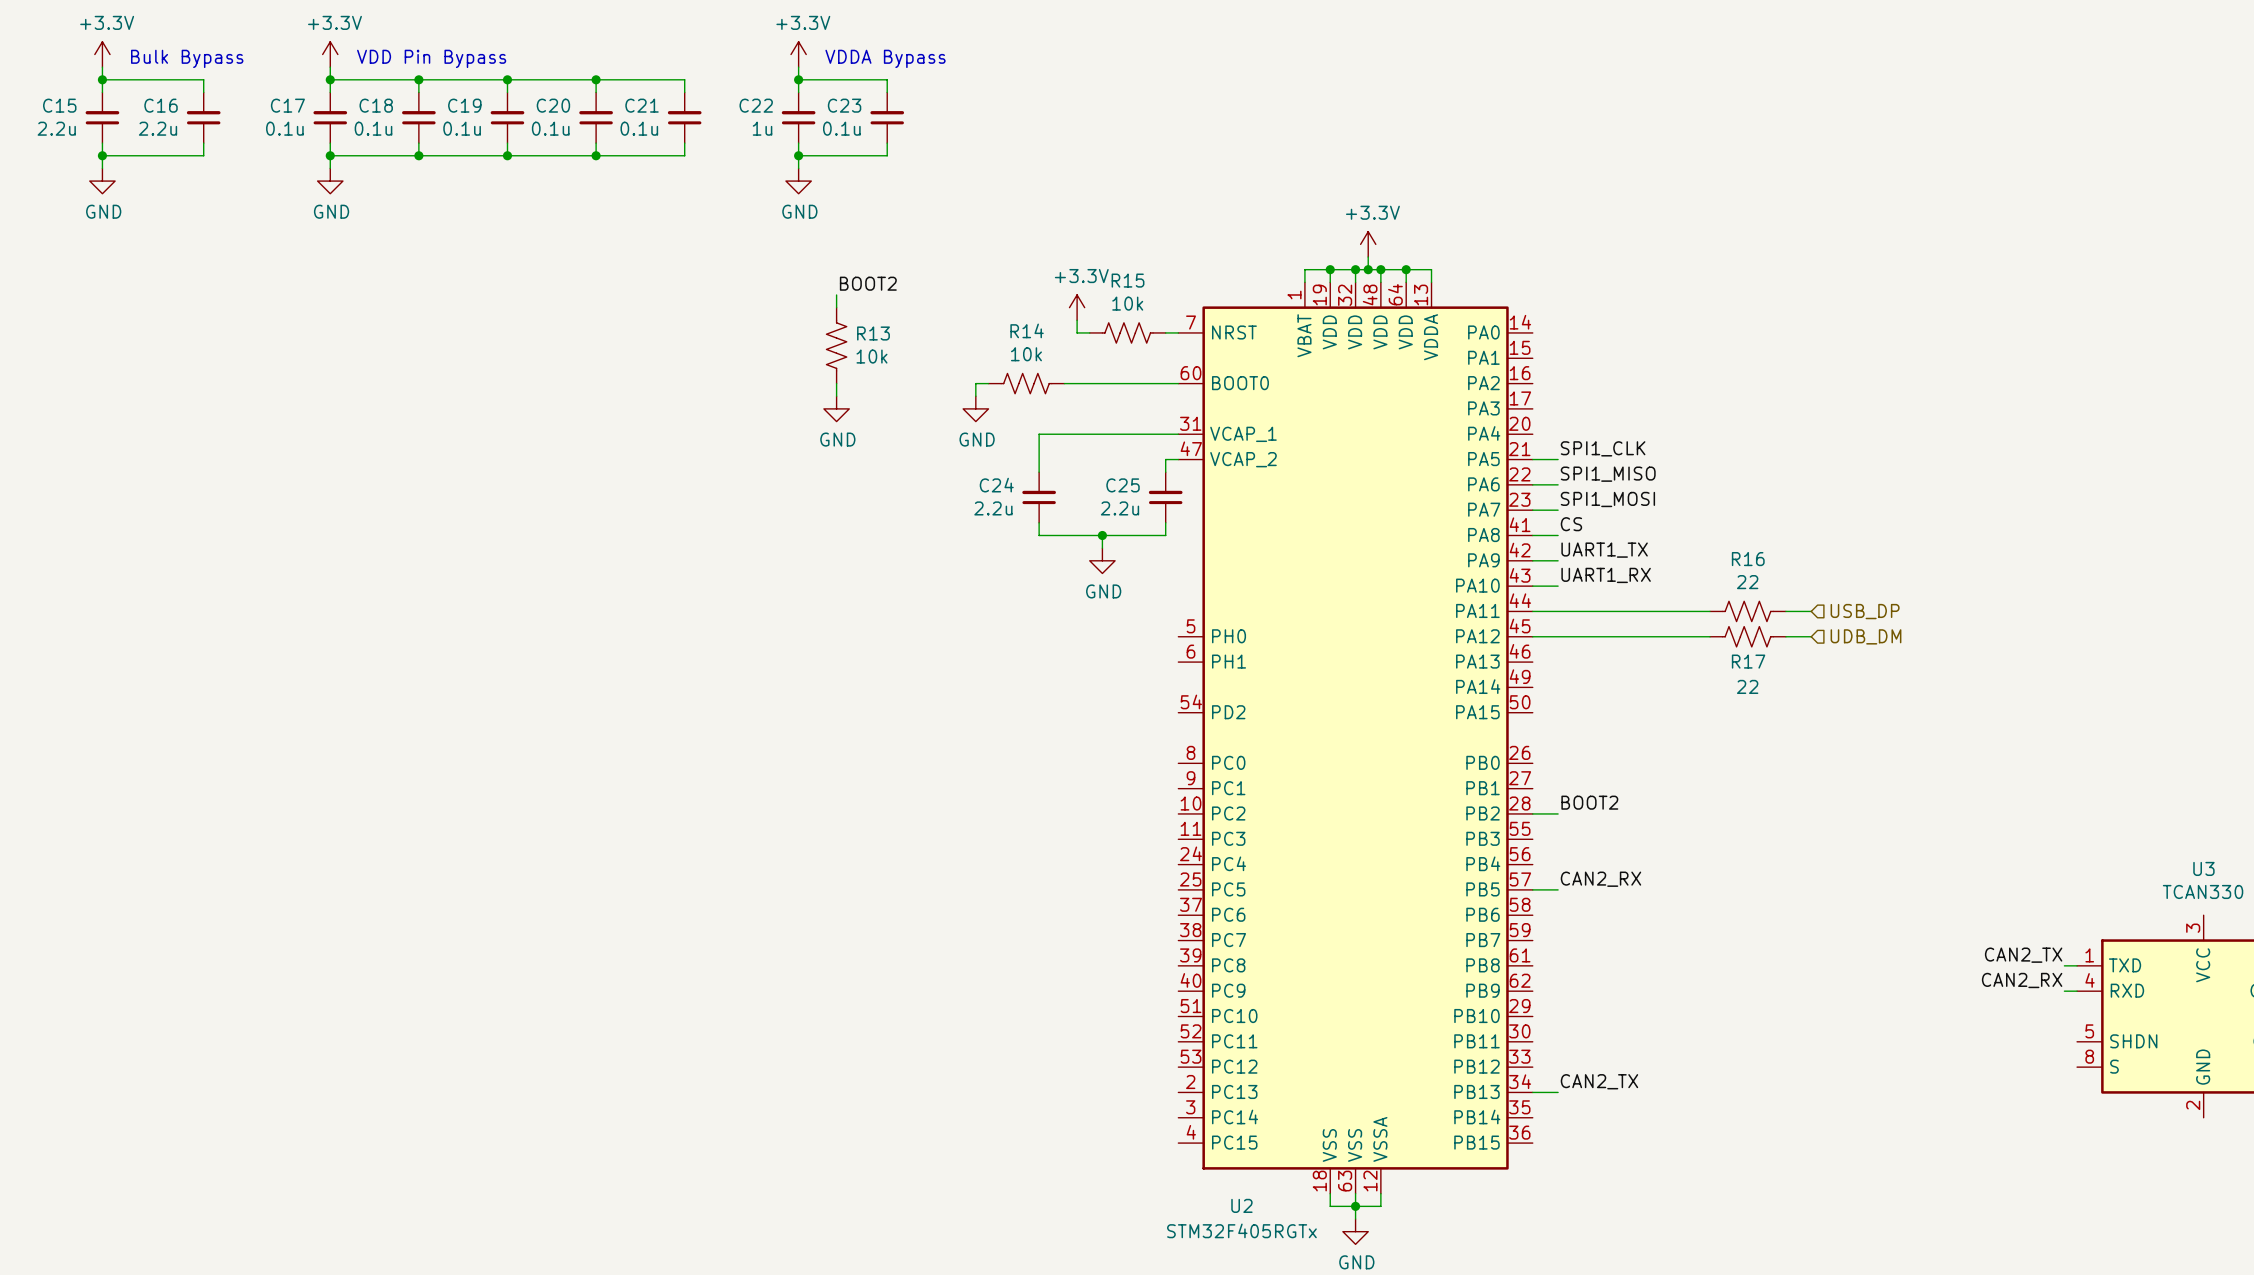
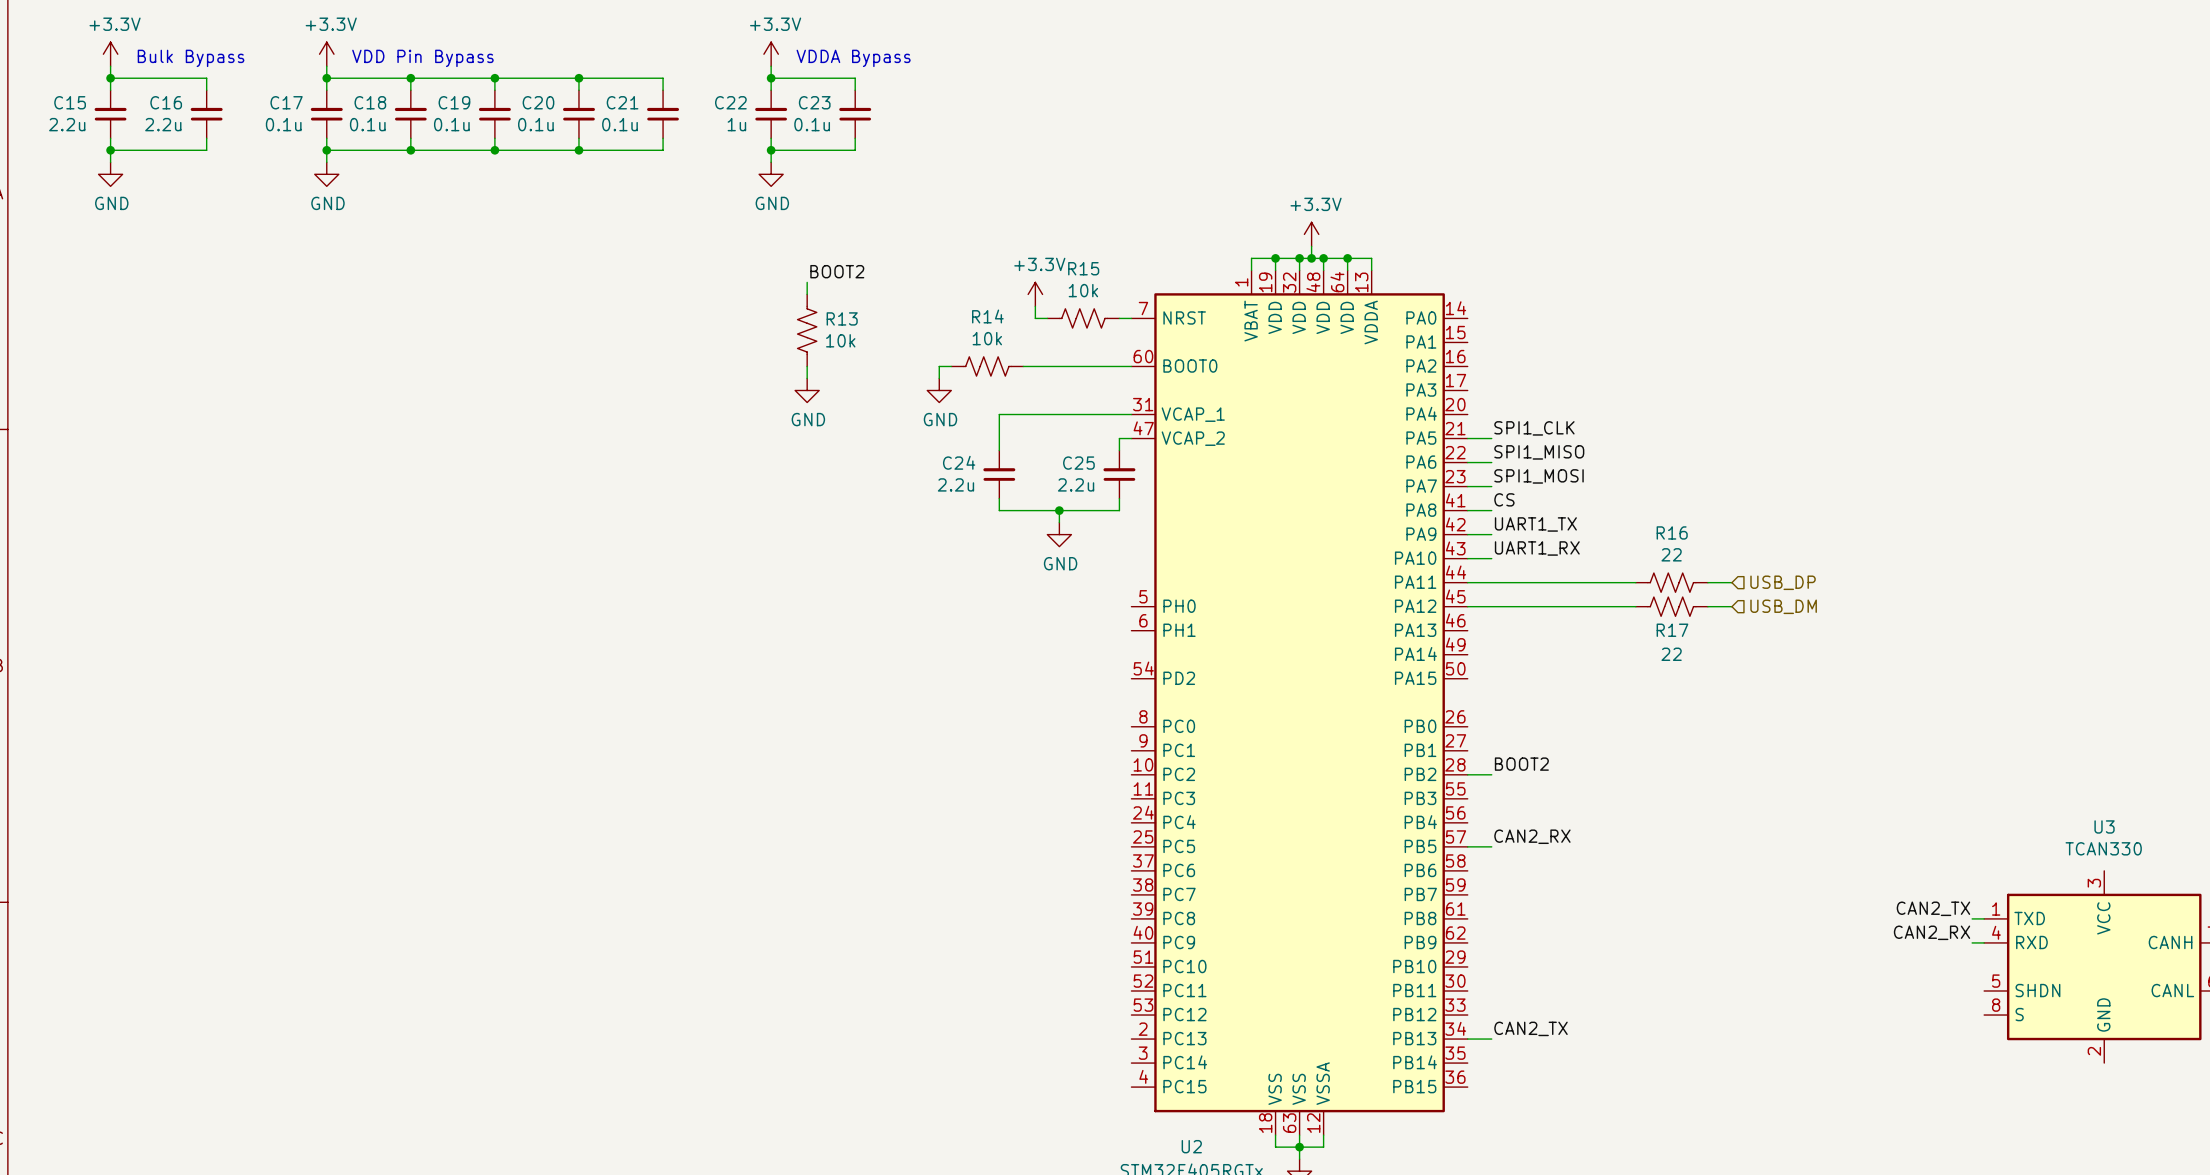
hierarchical label: UDB_DM (1865, 636) -> USB_DM (1783, 606)

